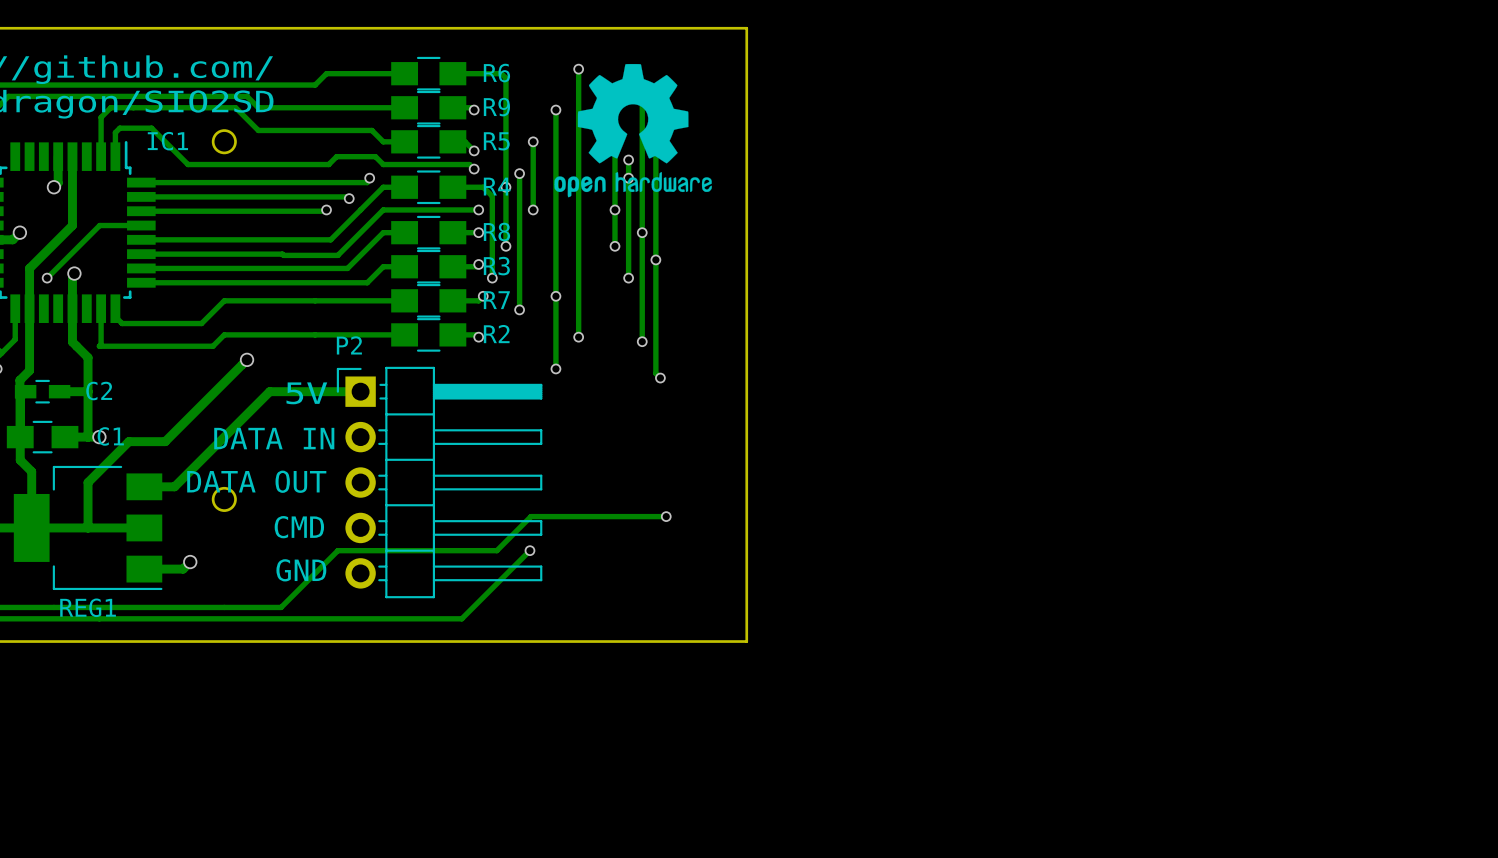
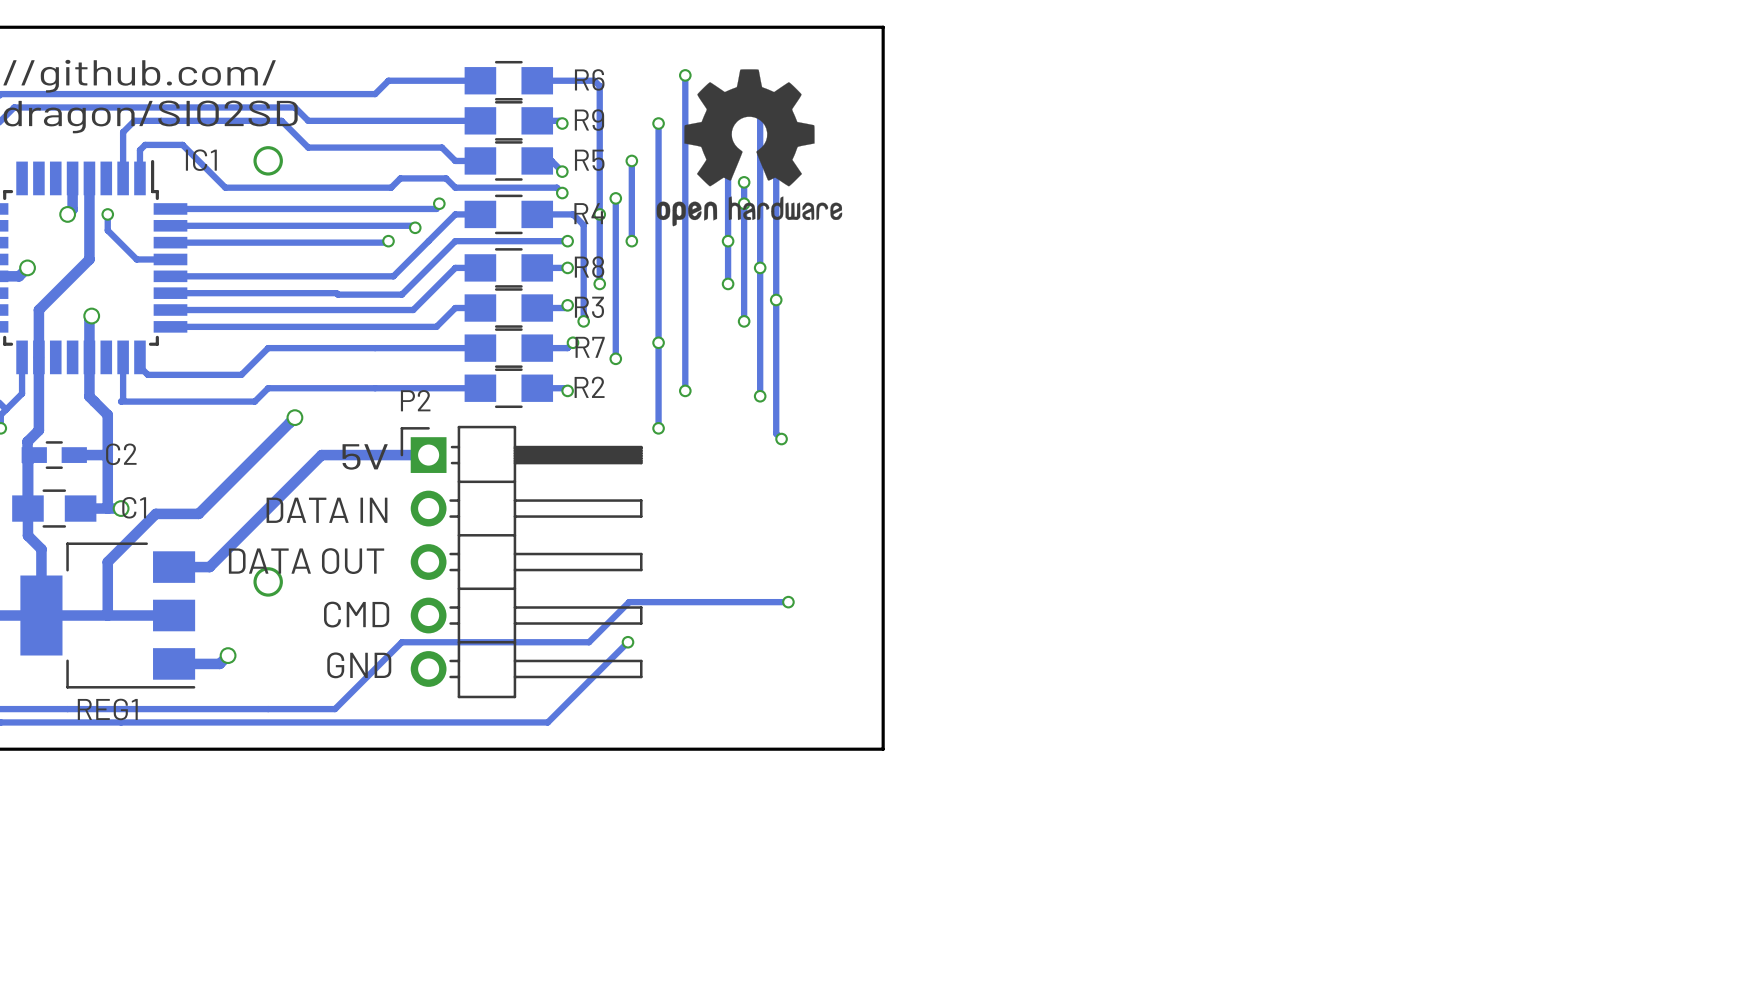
track: (112, 225) (99, 225) (47, 278) -> (136, 259) (107, 230) (107, 214)
via position: (47, 278) -> (107, 214)

